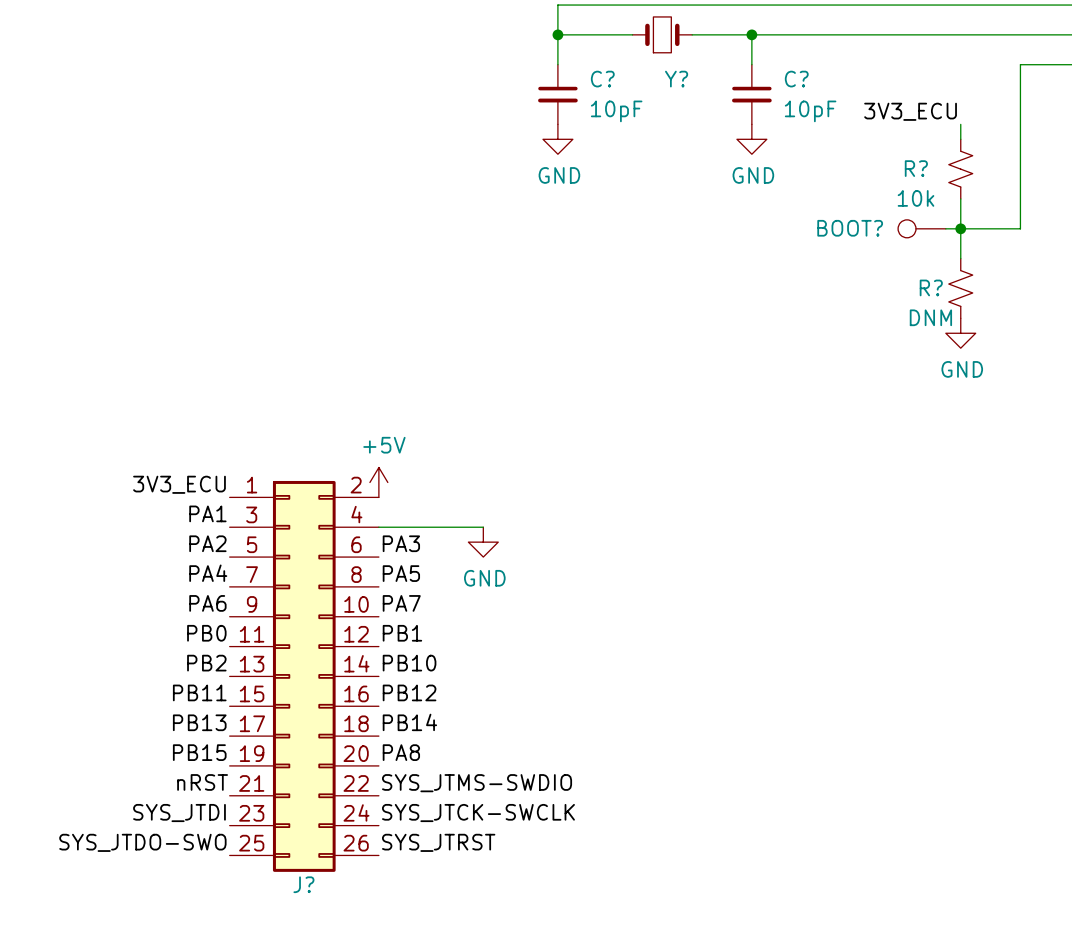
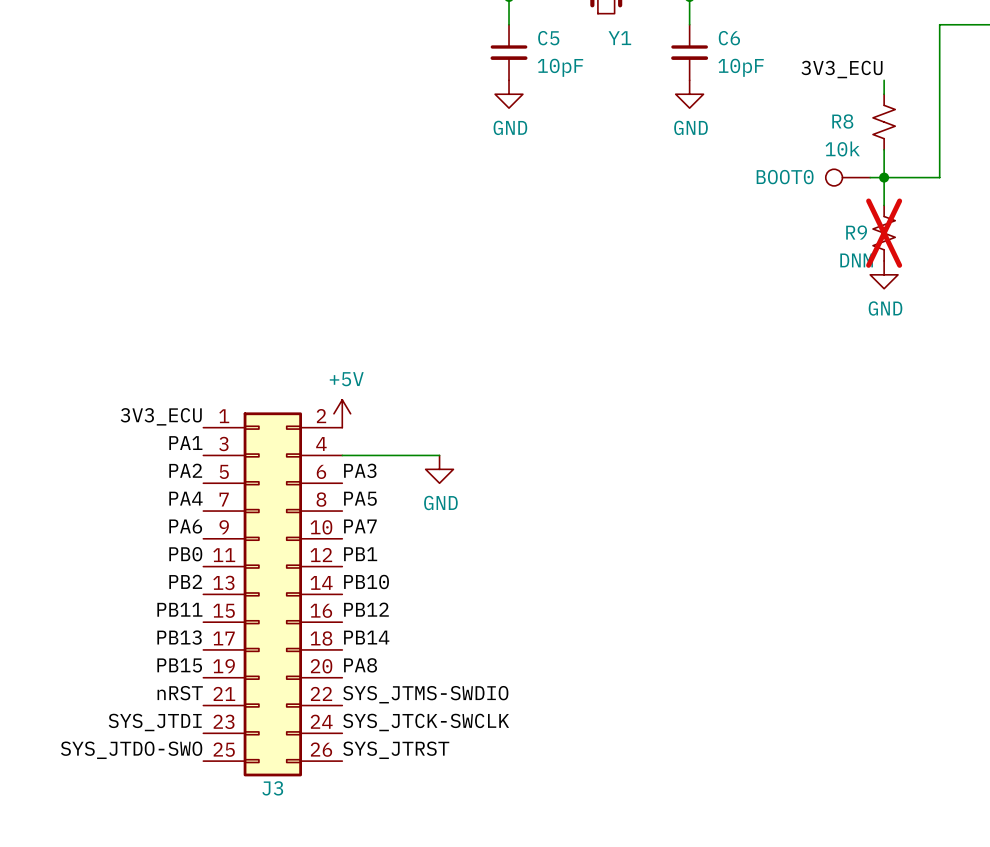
C? name: C? (602, 79) -> C5 (548, 38)
Y? name: Y? (676, 79) -> Y1 (619, 38)
C? name: C? (796, 79) -> C6 (729, 38)
R? name: R? (916, 168) -> R8 (842, 121)
BOOT? name: BOOT? (850, 228) -> BOOT0 (785, 177)
R? name: R? (931, 287) -> R9 (856, 232)
R? do-not-place cross: none -> (884, 233)
J? name: J? (303, 884) -> J3 (272, 788)

